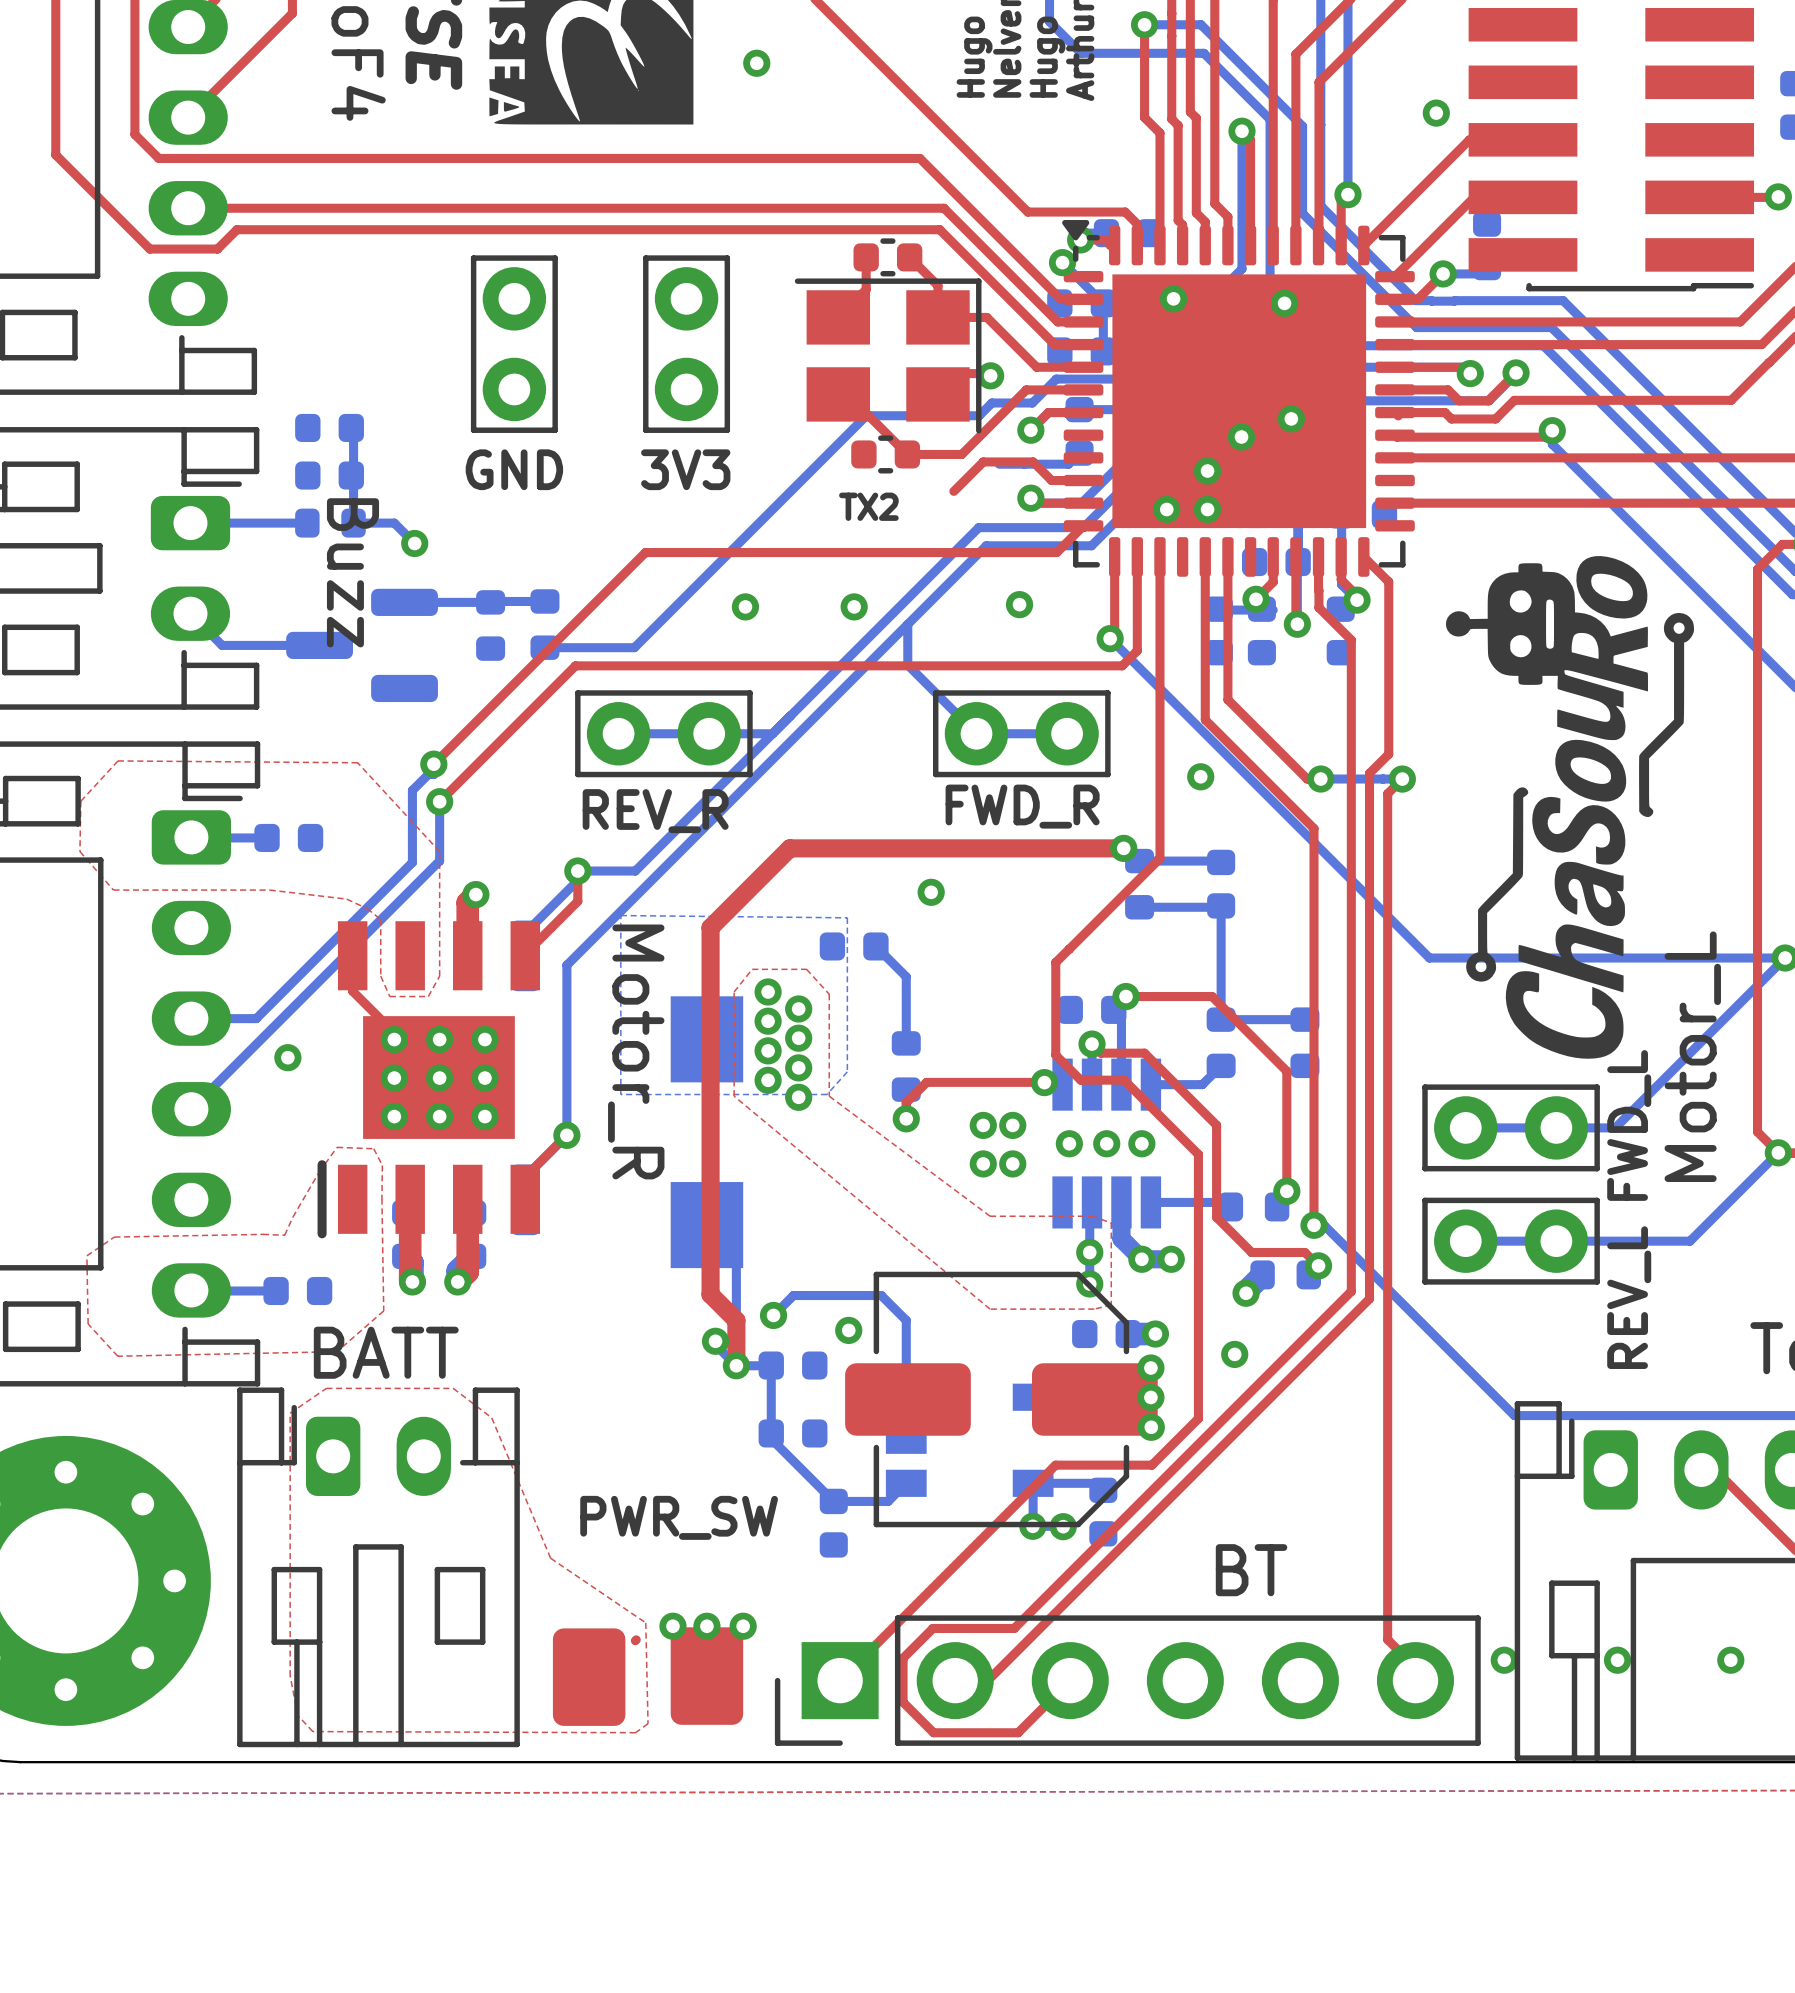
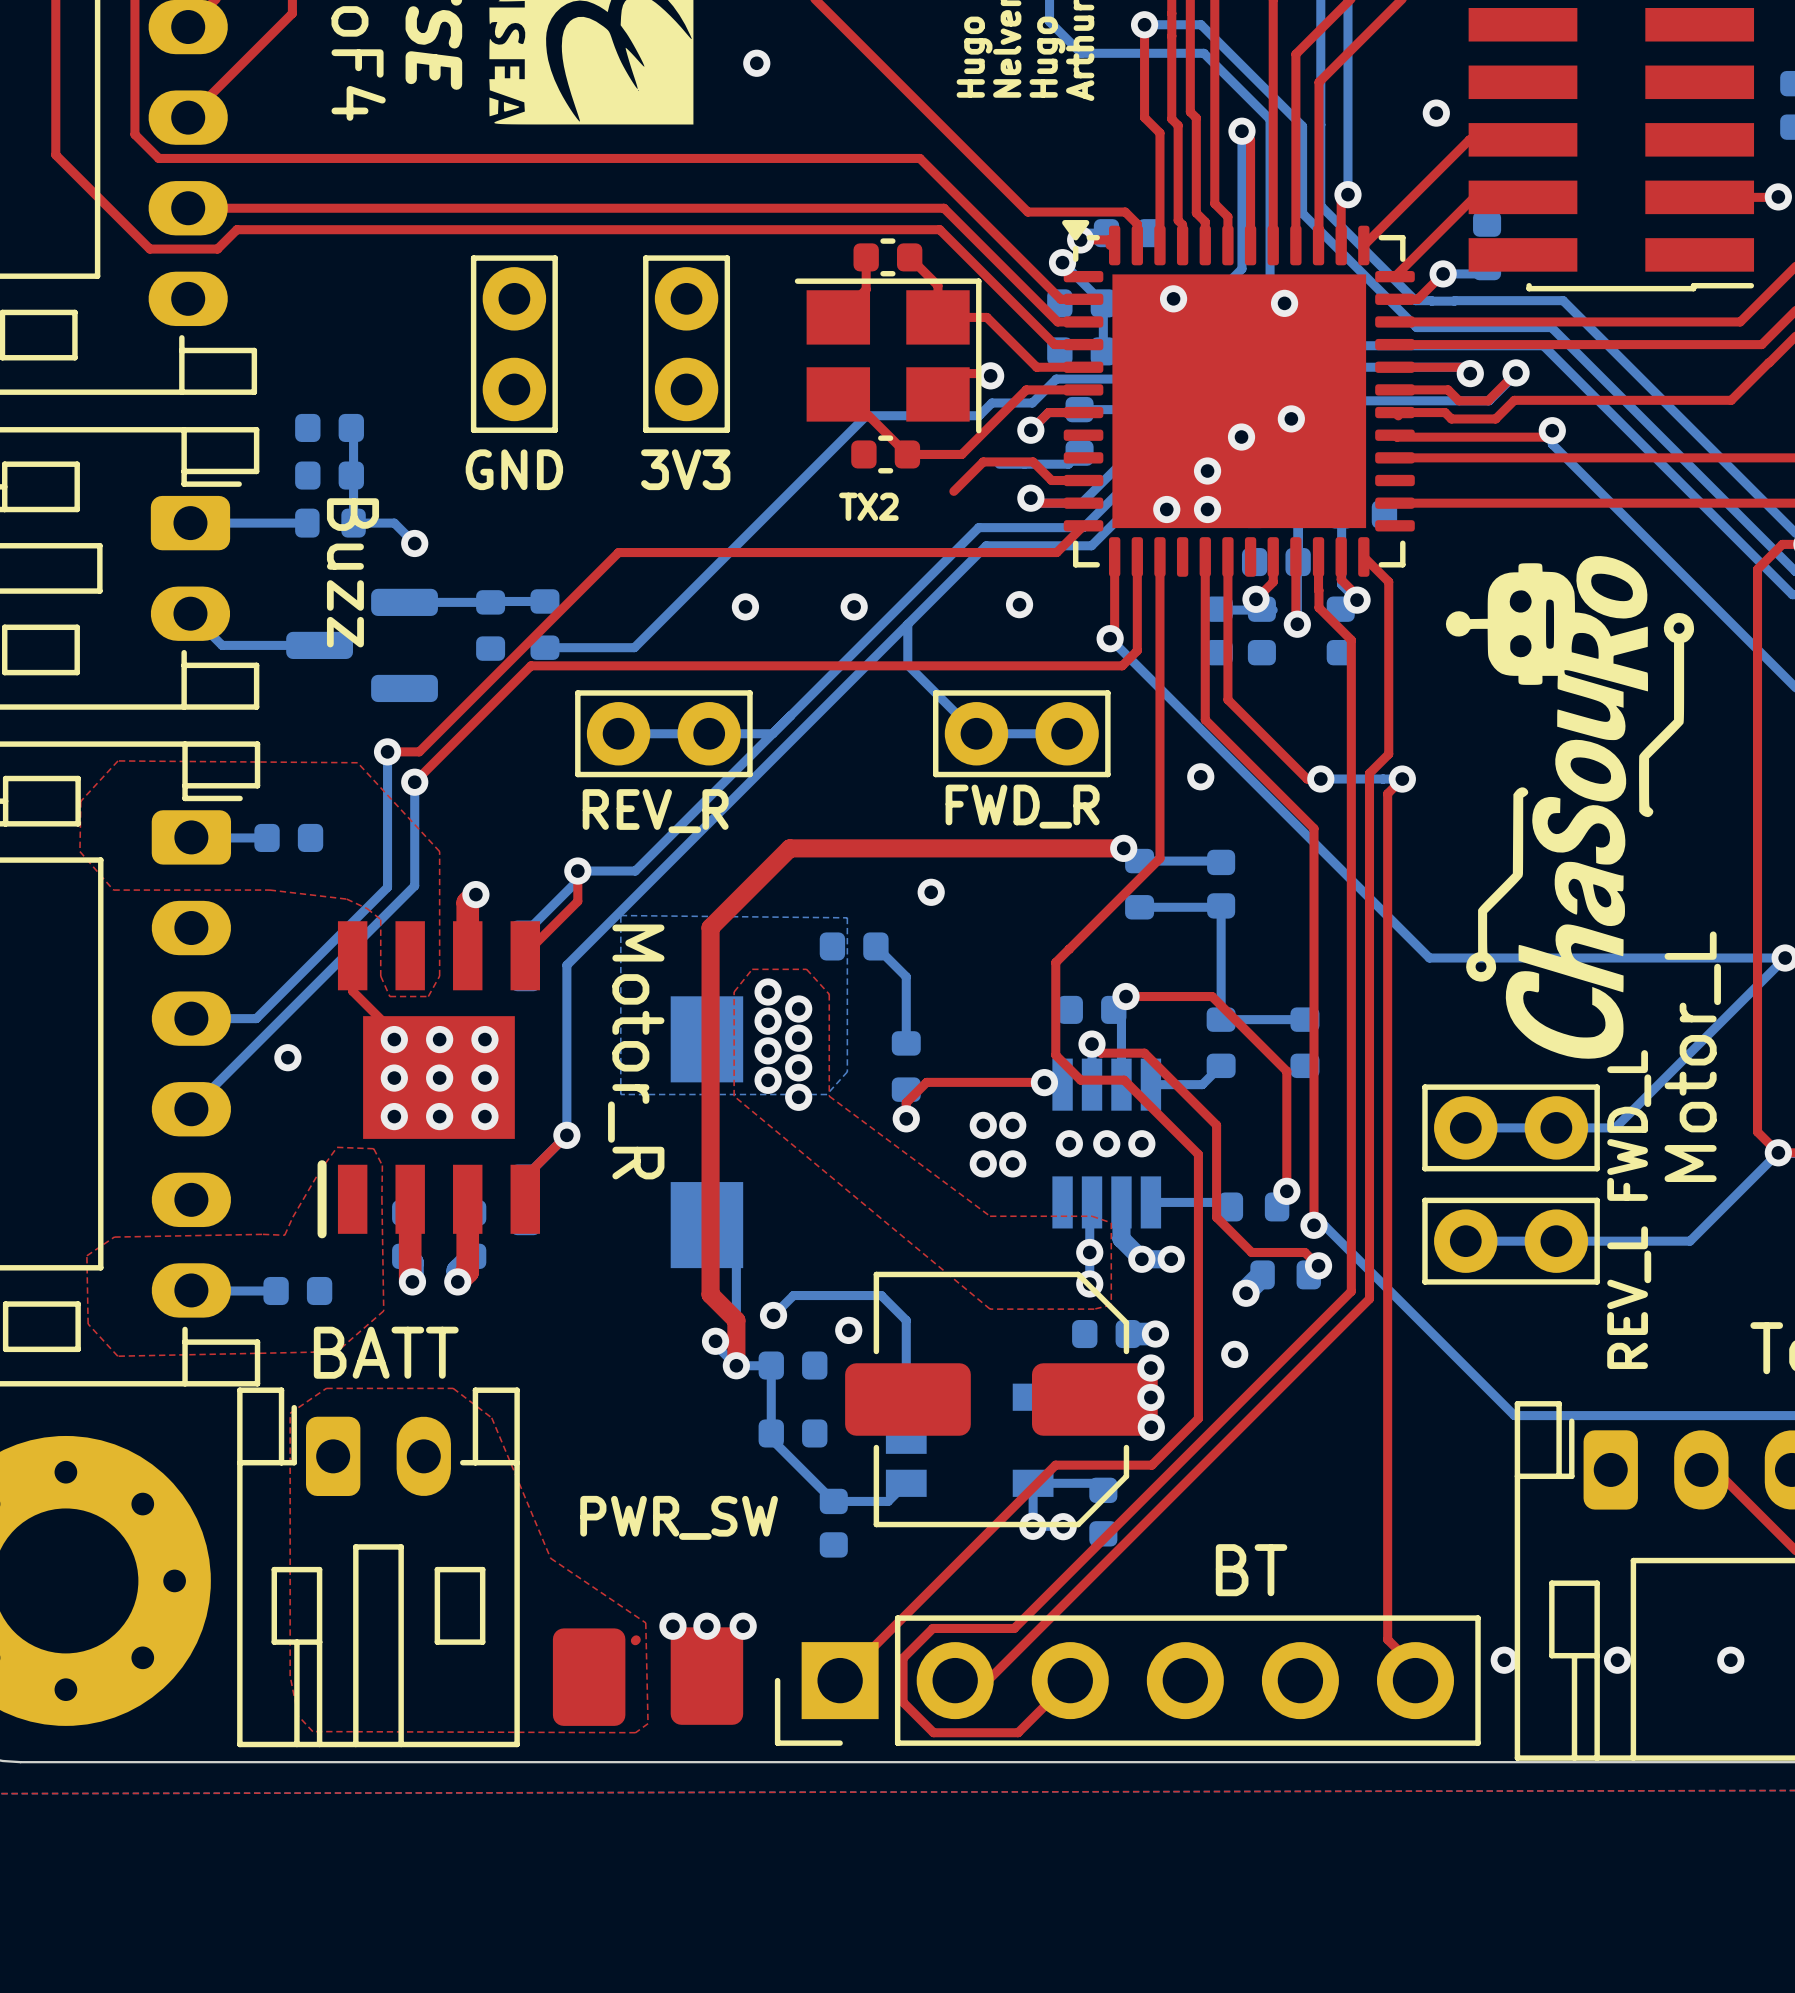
top track: (645, 552) (434, 763) -> (645, 552) (618, 552) (419, 751) (387, 751)
top track: (575, 665) (441, 799) (439, 799) -> (575, 665) (530, 665) (414, 782)
via: none -> (387, 751)
bottom track: (434, 763) (433, 774) (428, 774) (412, 790) (412, 862) (387, 887) -> (387, 751) (387, 887)
via: (433, 764) -> none
via: none -> (414, 782)
bottom track: (439, 799) (439, 860) (414, 885) -> (414, 782) (414, 885)
via: (439, 801) -> none

